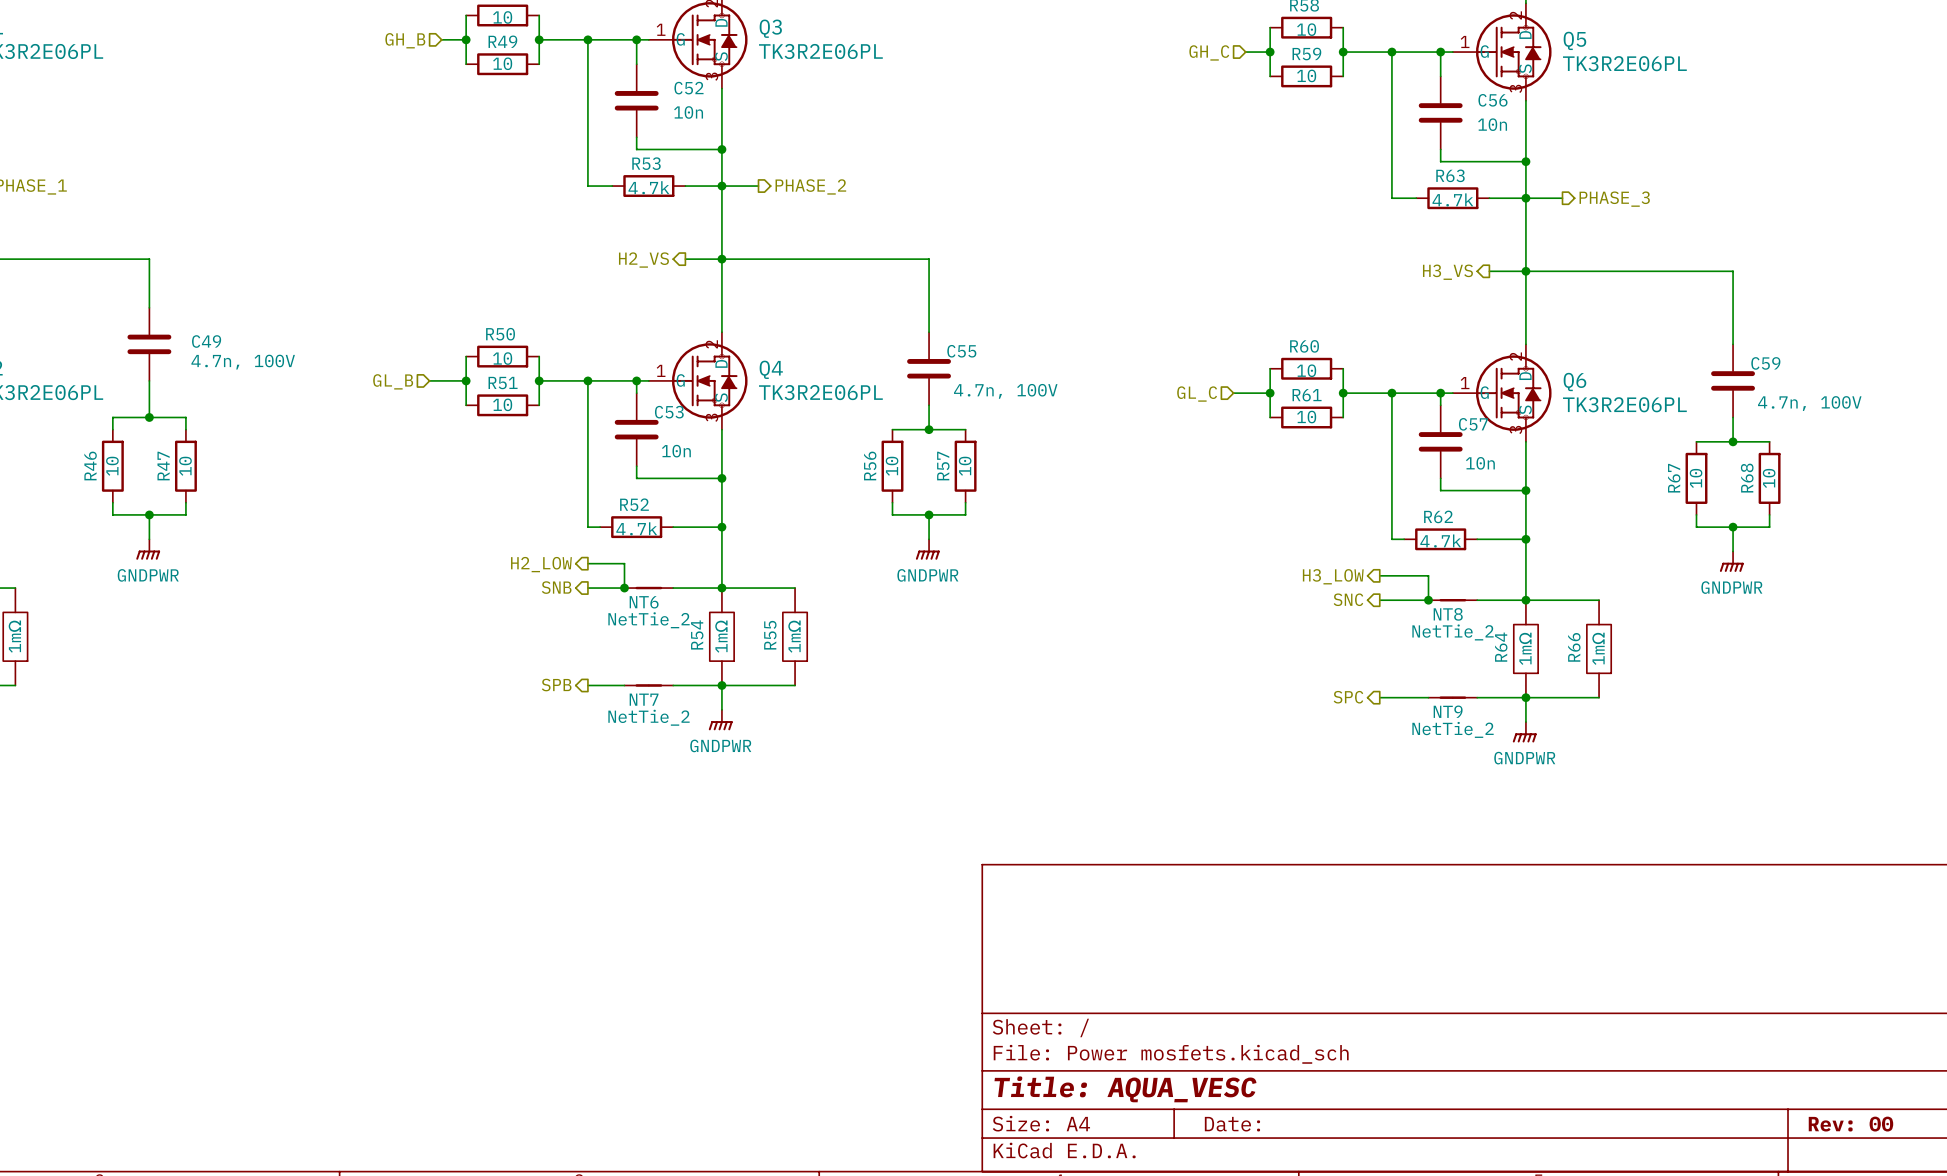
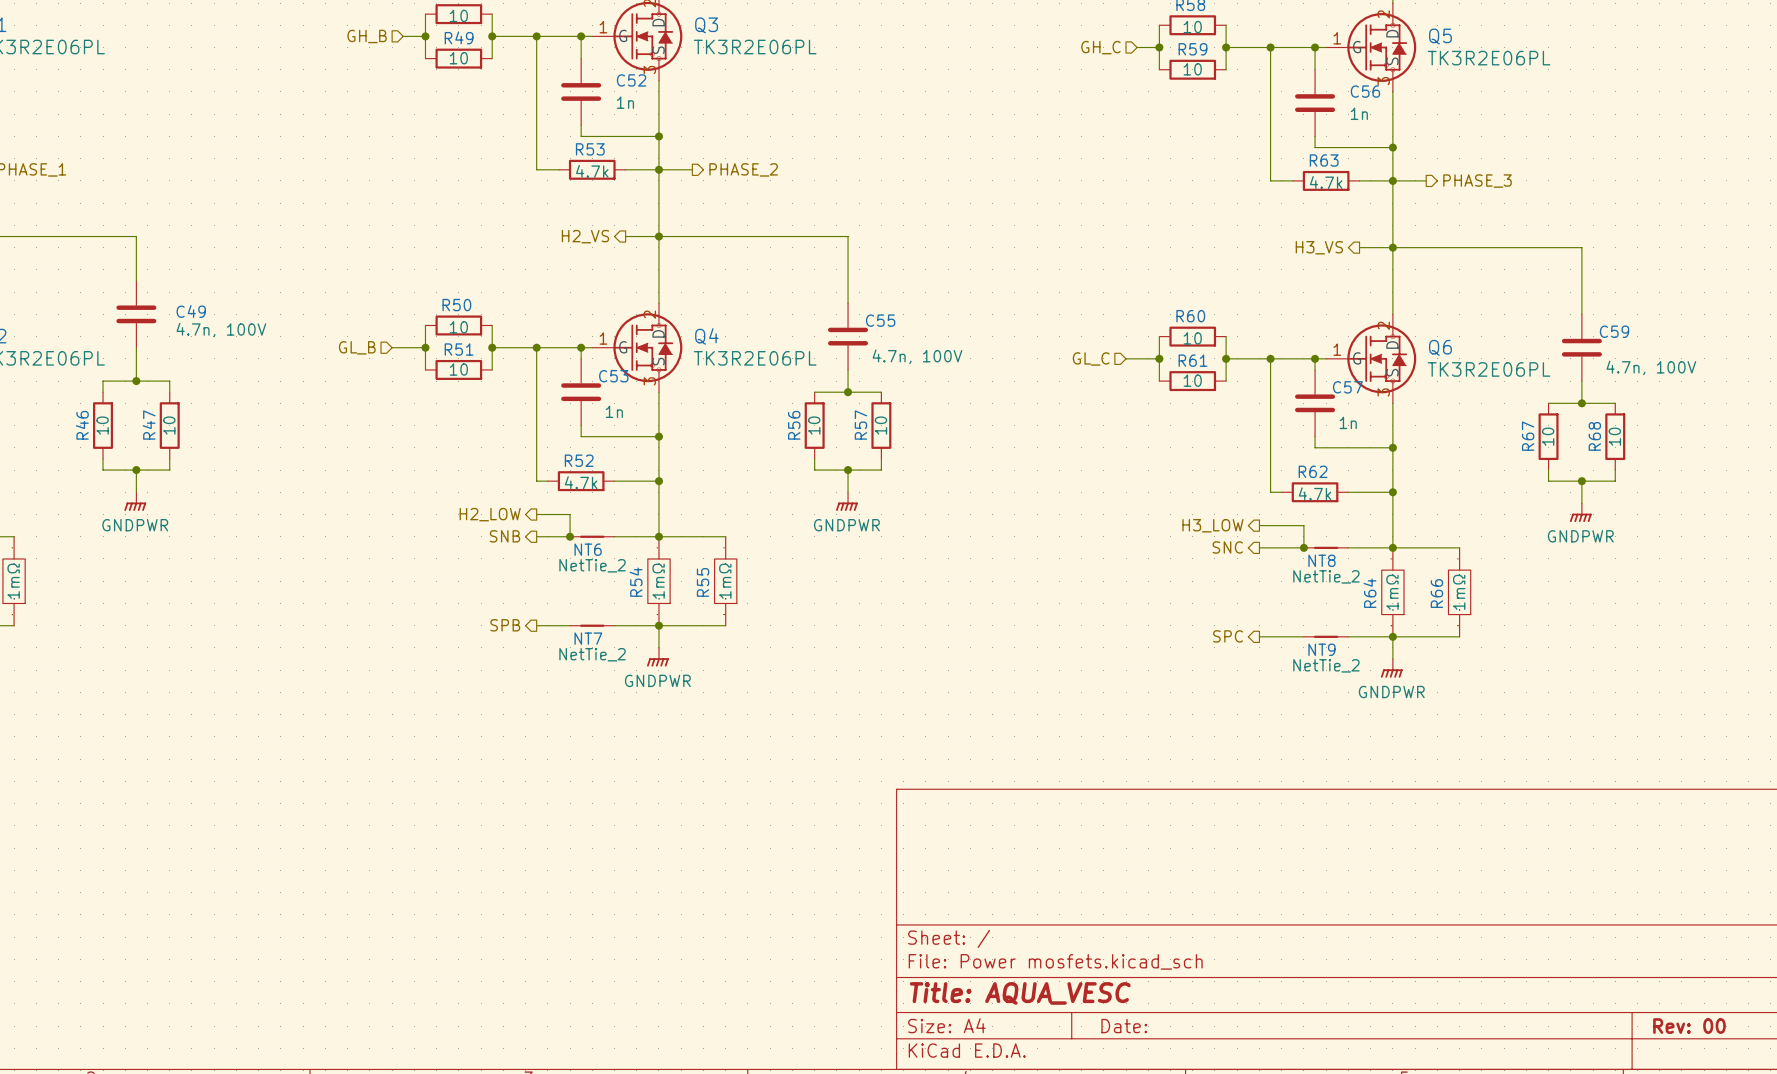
C52 value: 10n (688, 112) -> 1n (625, 102)
C56 value: 10n (1492, 124) -> 1n (1359, 113)
C53 value: 10n (676, 451) -> 1n (614, 411)
C57 value: 10n (1480, 463) -> 1n (1348, 422)

